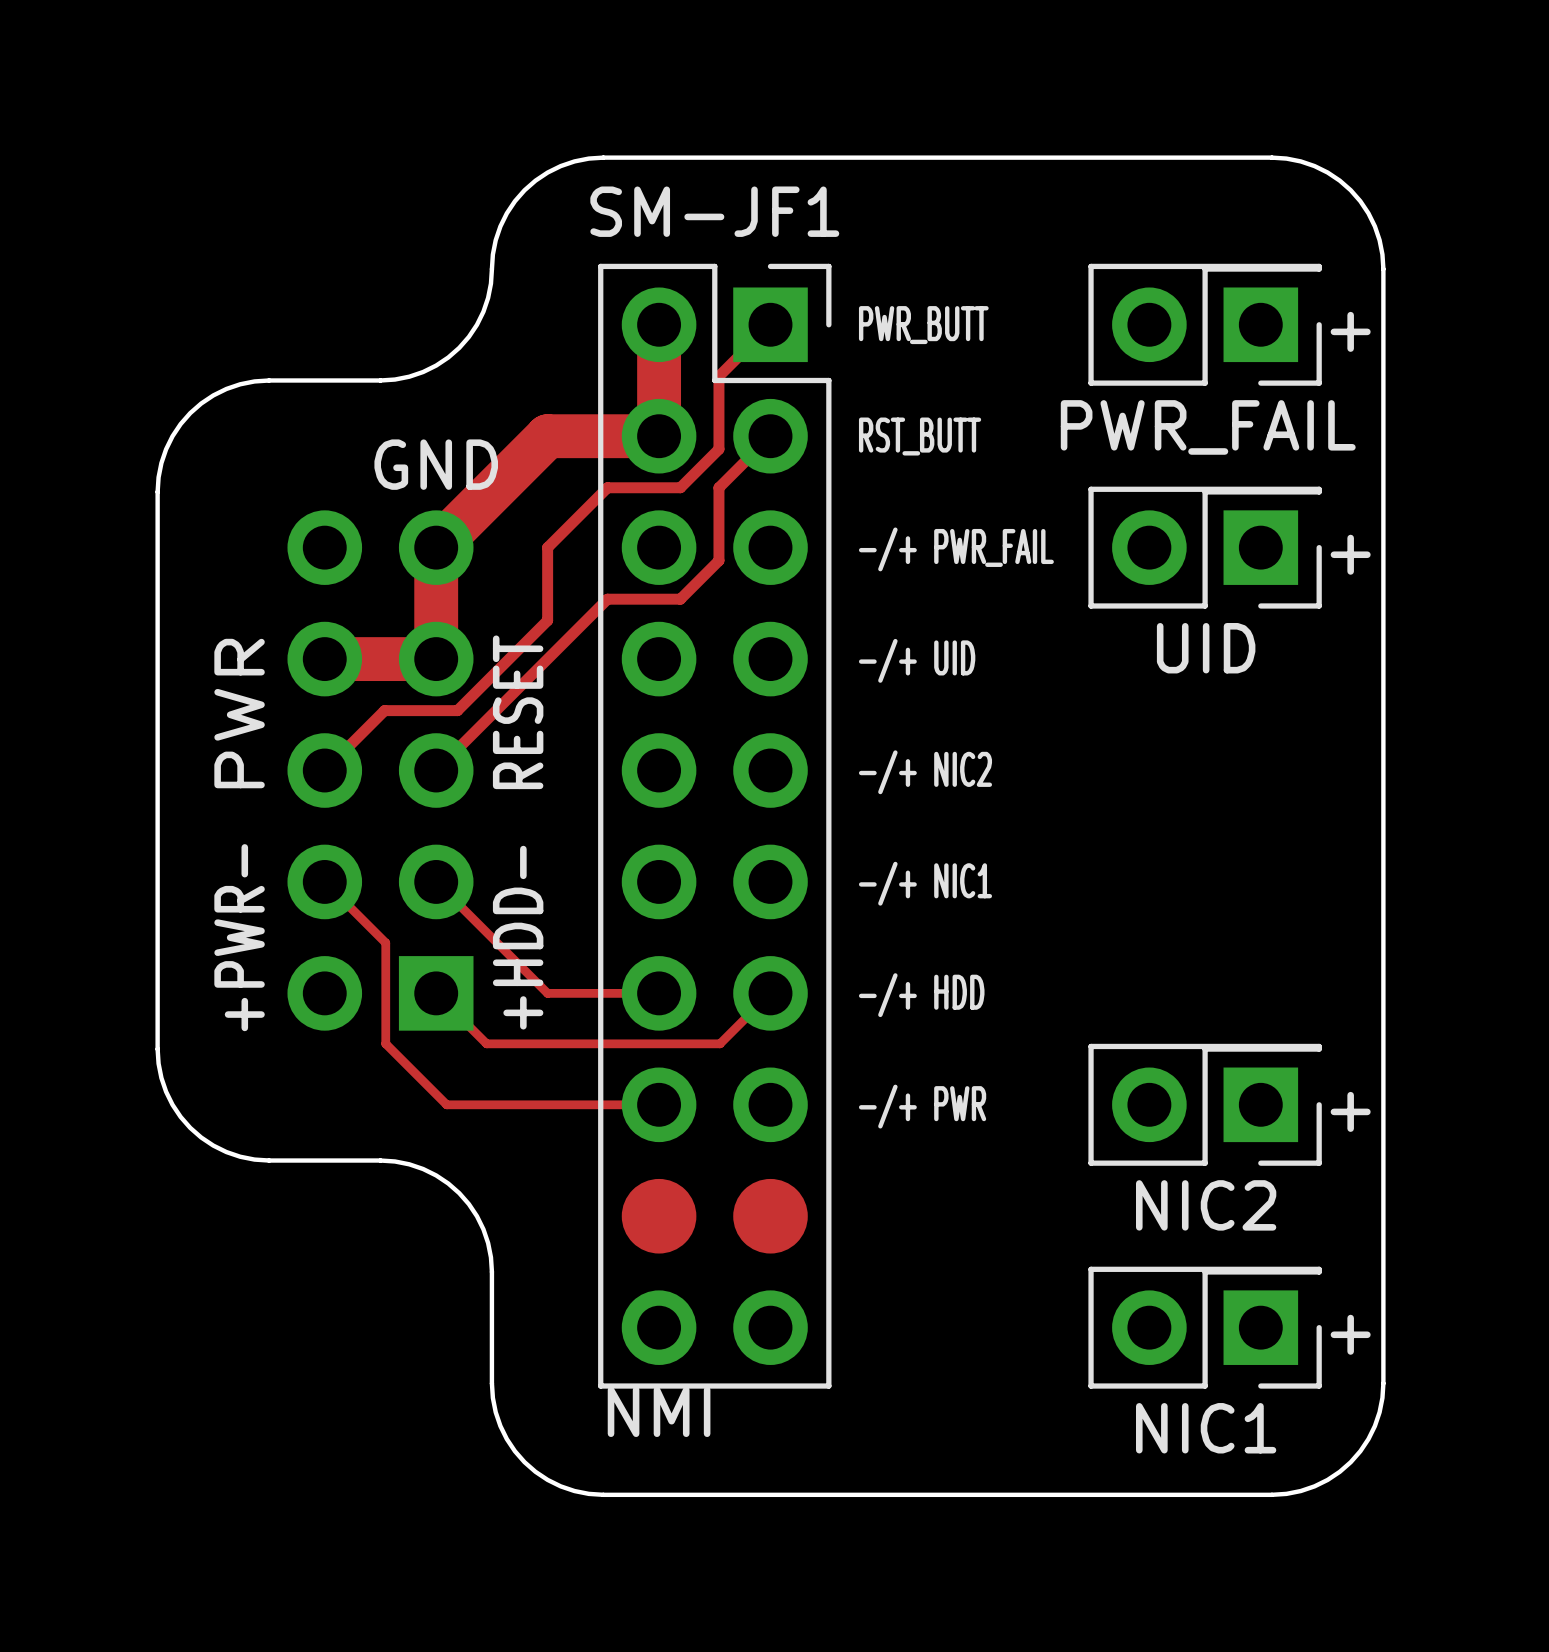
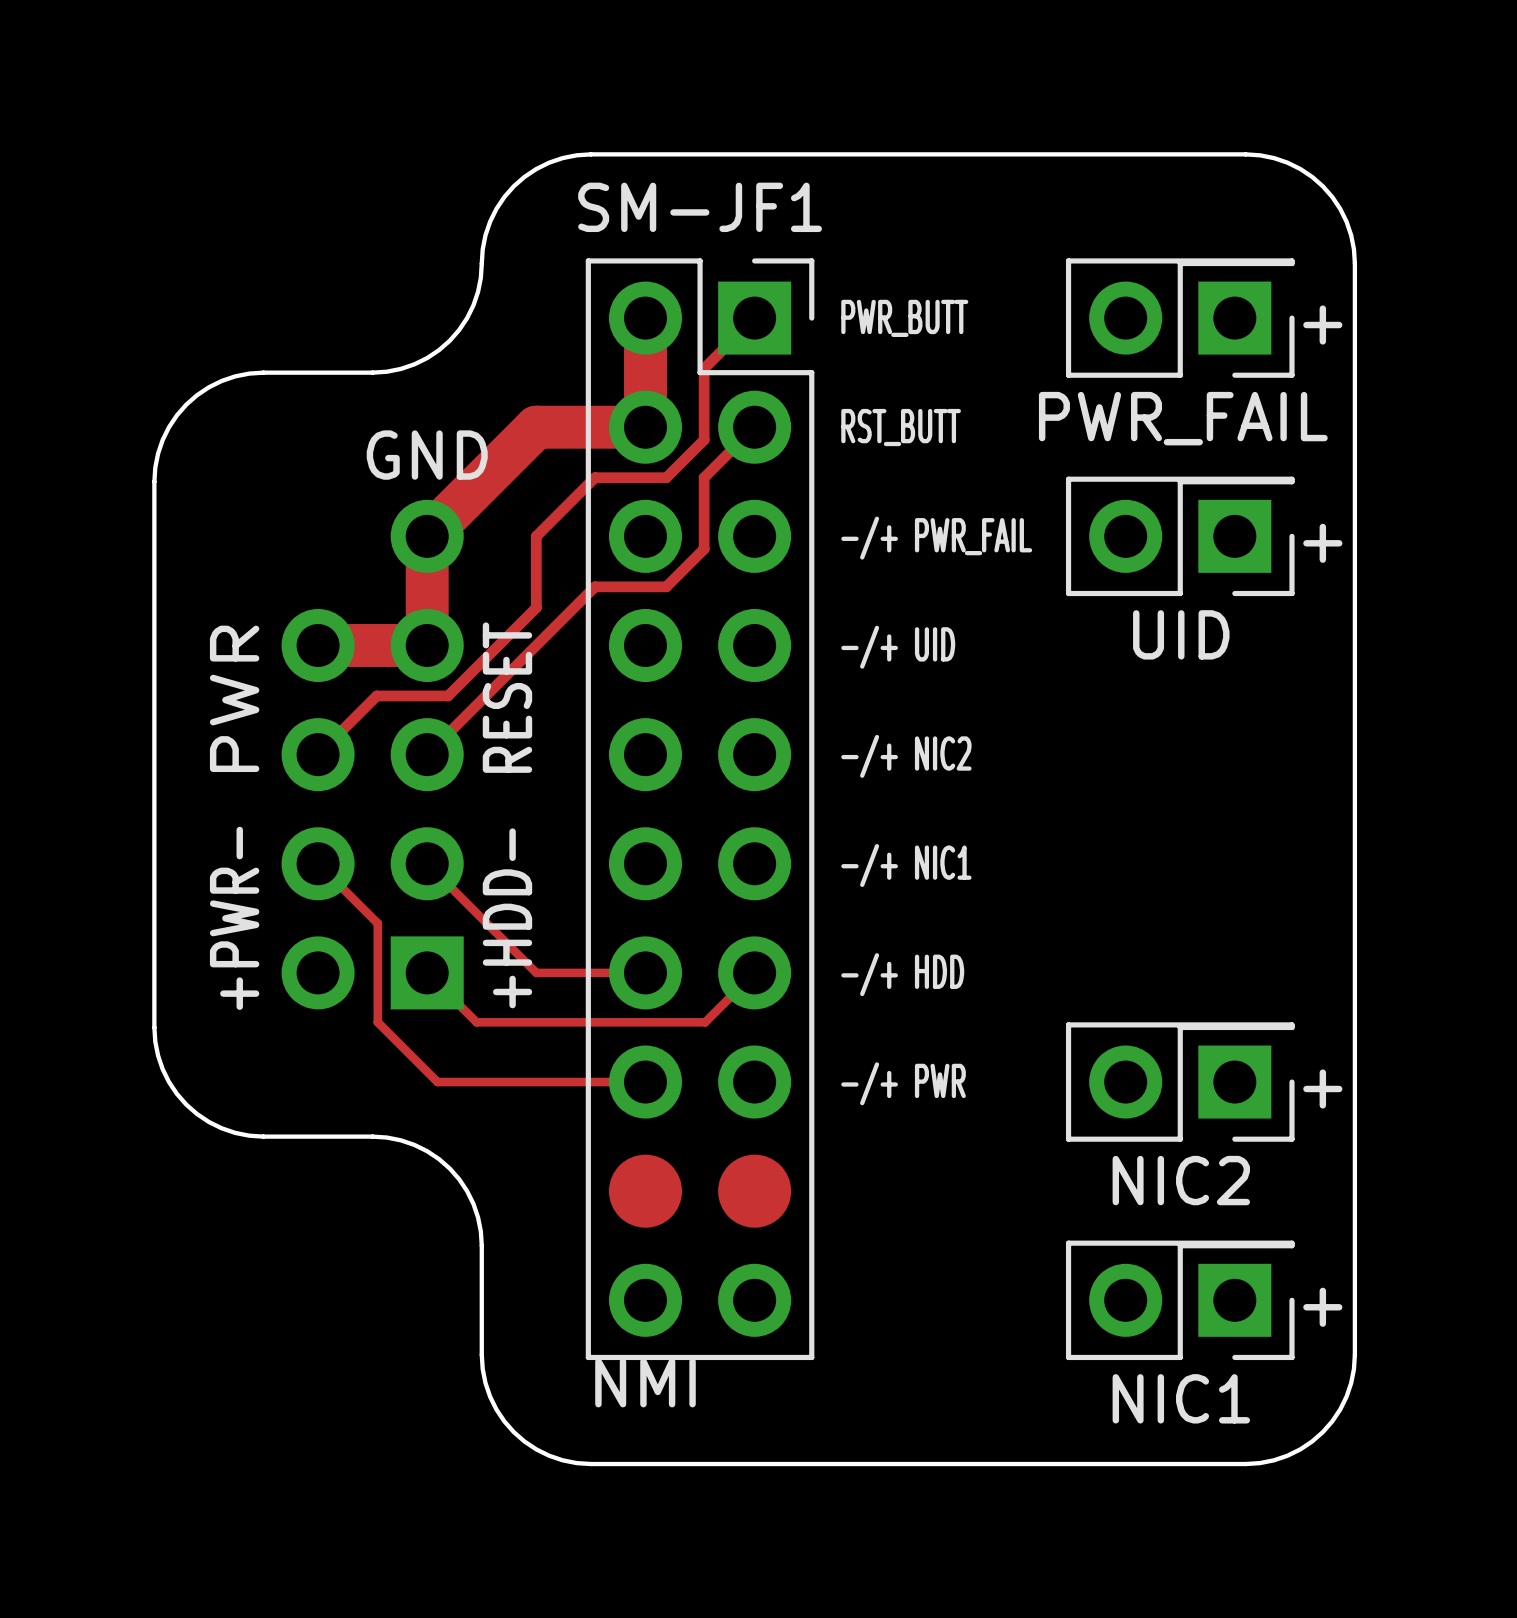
part footprint: [287, 510, 474, 1031] -> [281, 499, 464, 1010]

